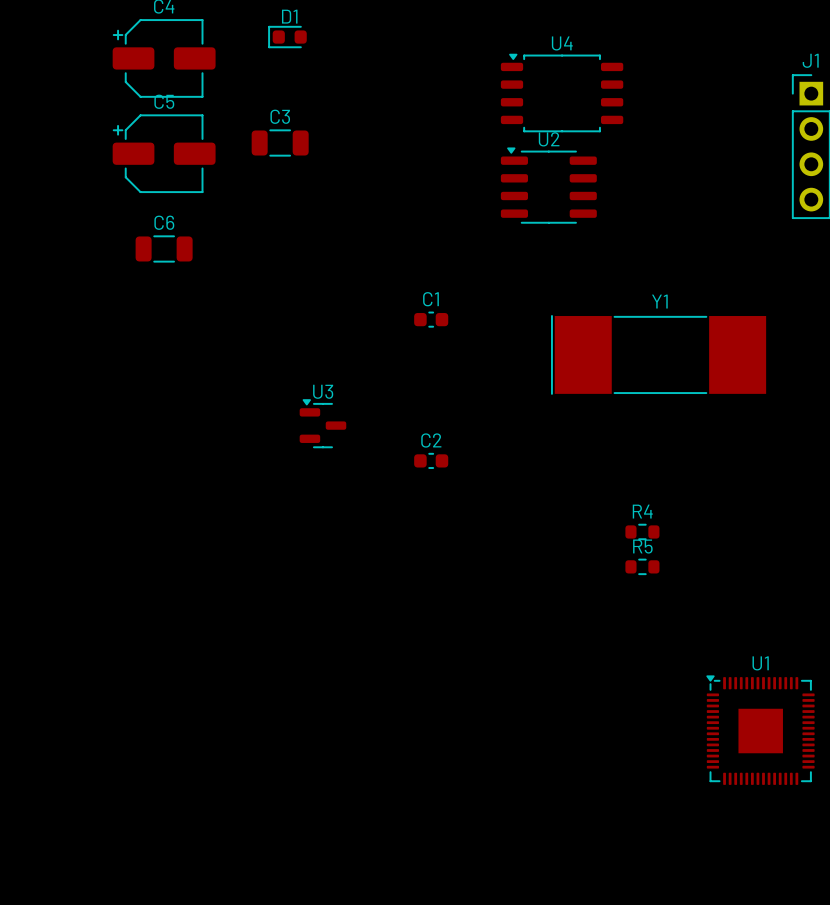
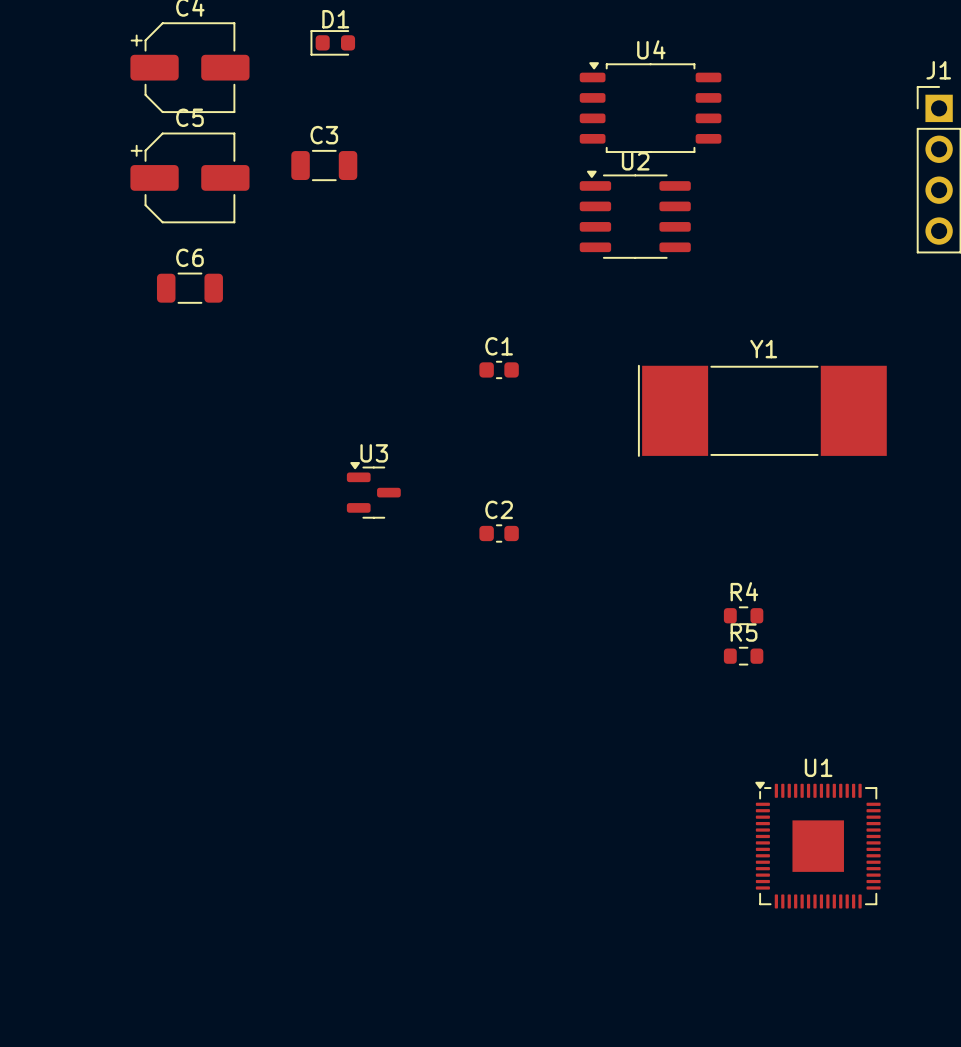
U1 position: (760, 730) -> (817, 845)

